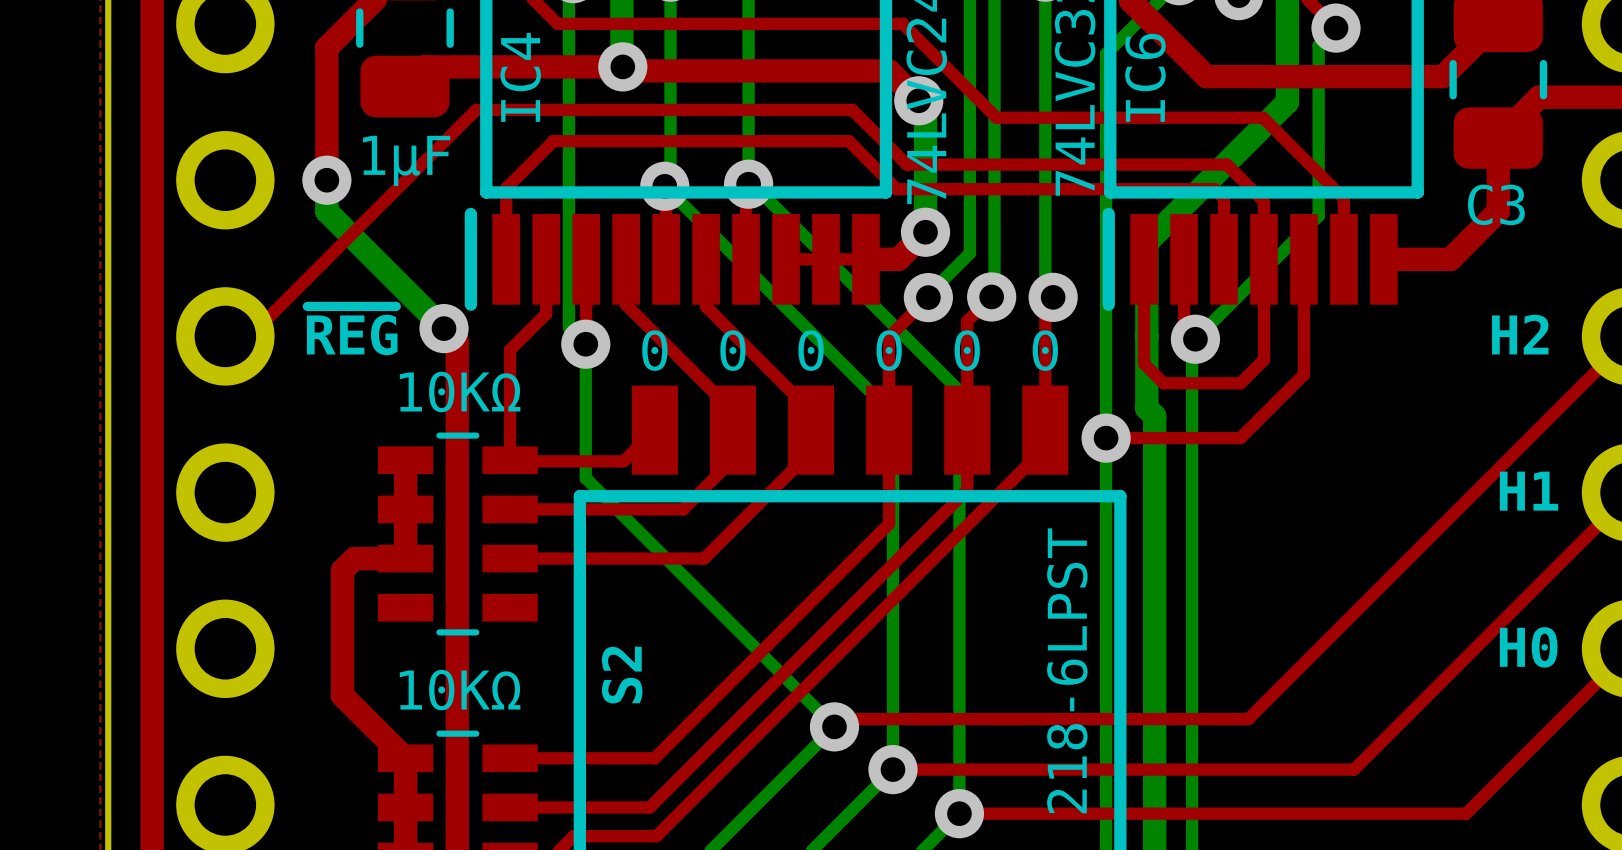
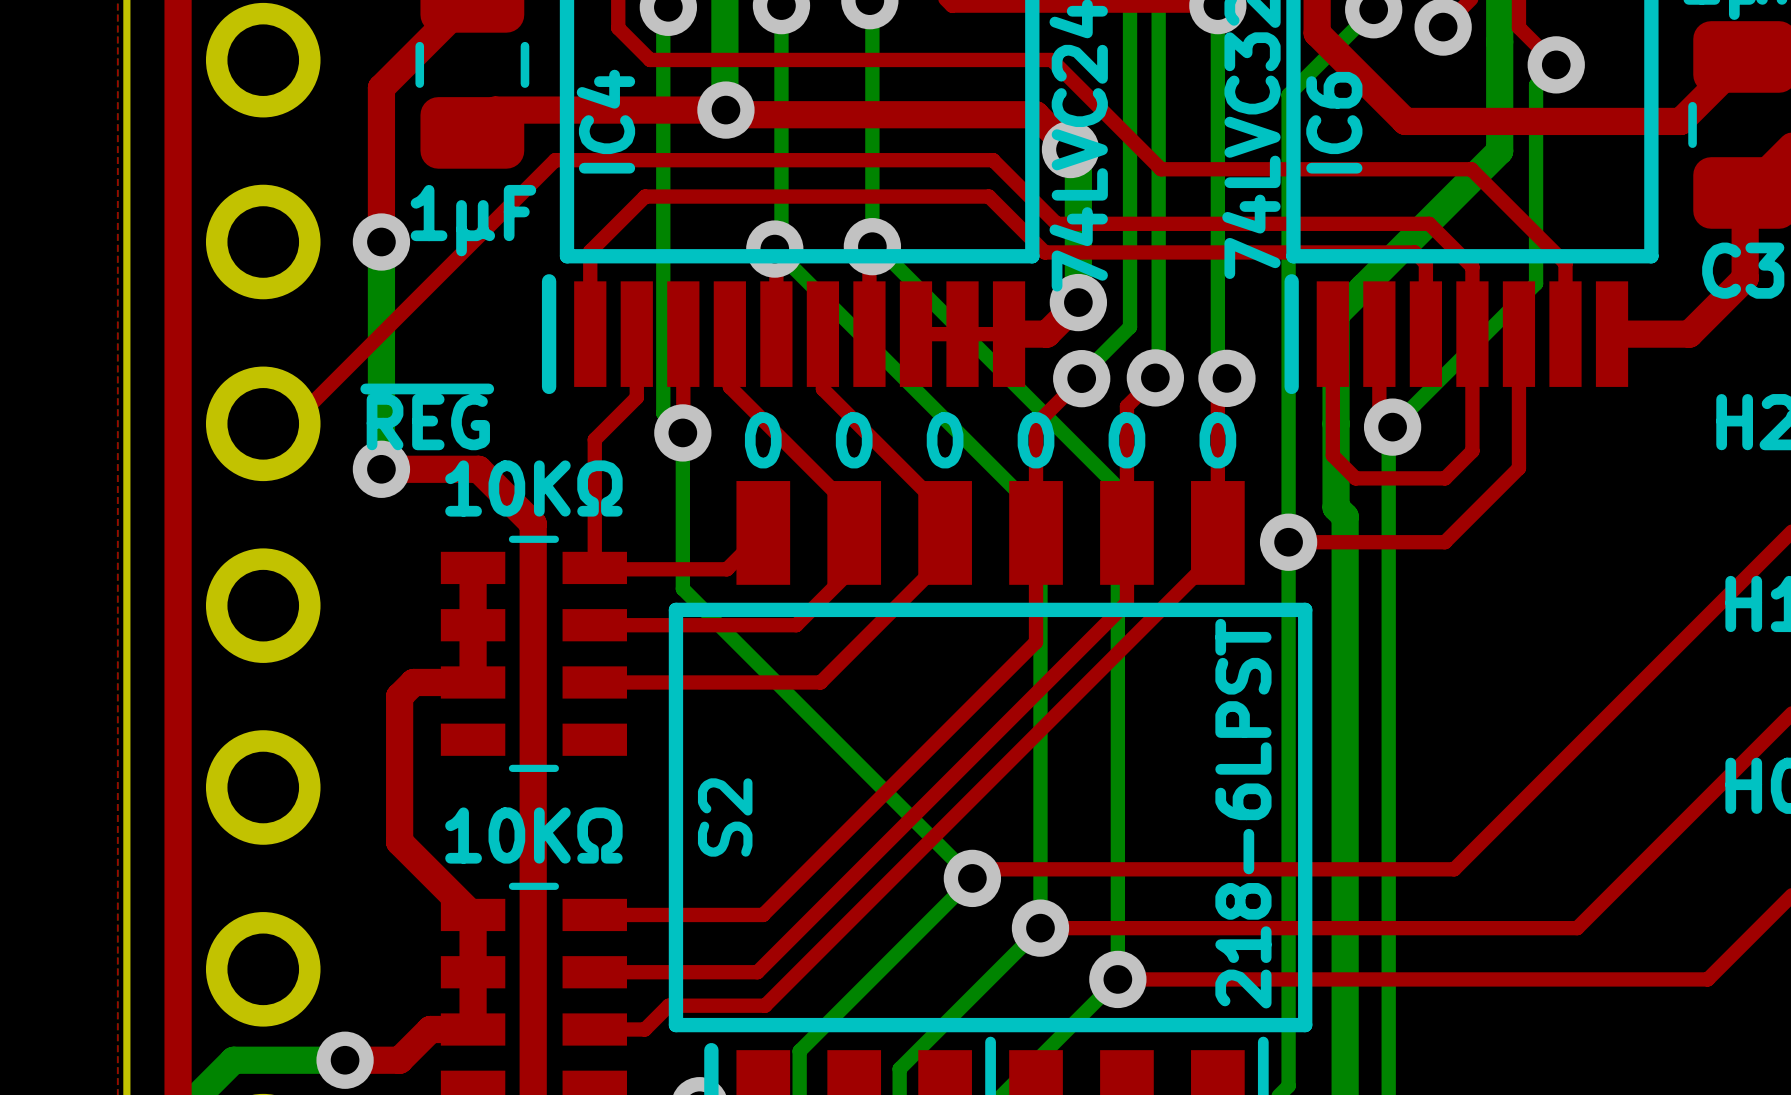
bottom track: (326, 211) (444, 328) -> (381, 278) (381, 469)
top track: (444, 328) (457, 341) (457, 422) -> (381, 469) (478, 469) (533, 523)
via position: (444, 328) -> (381, 469)

